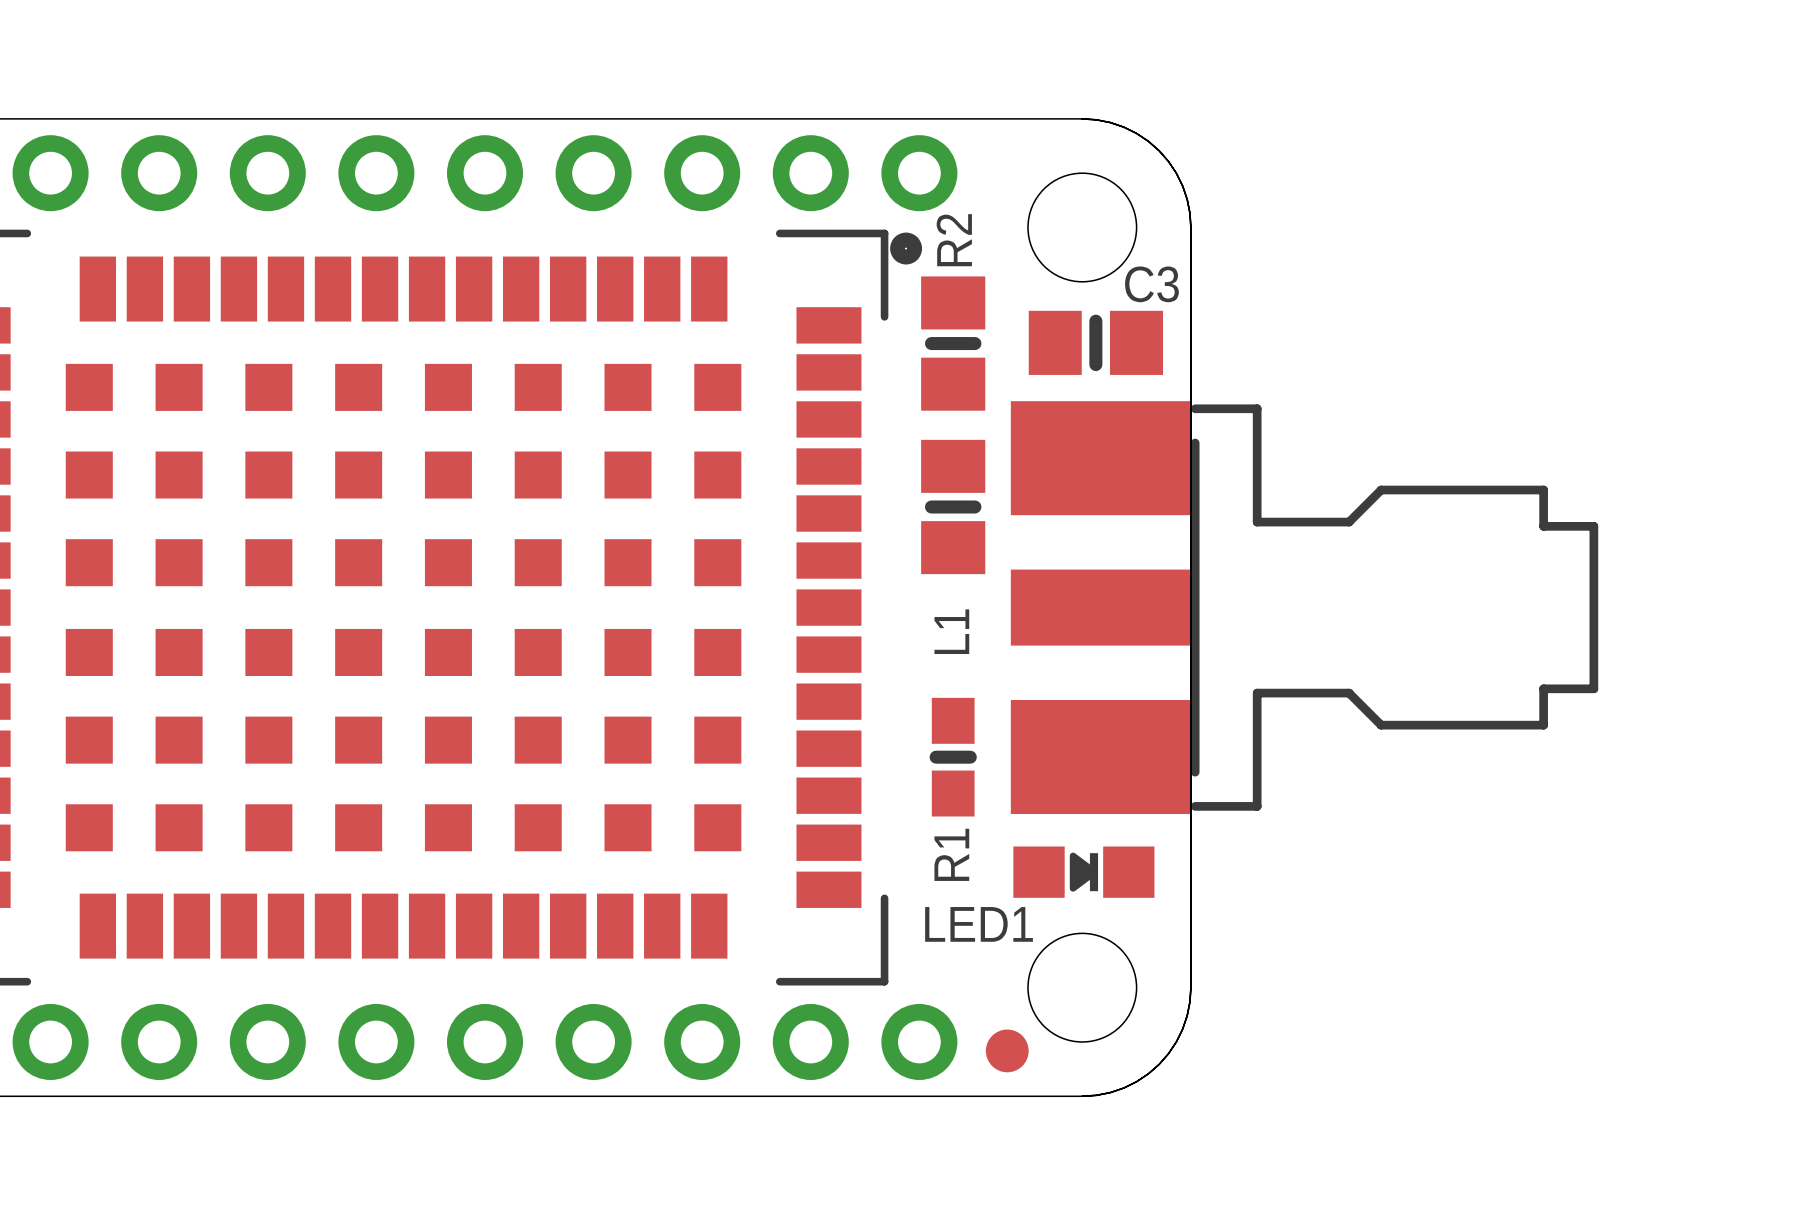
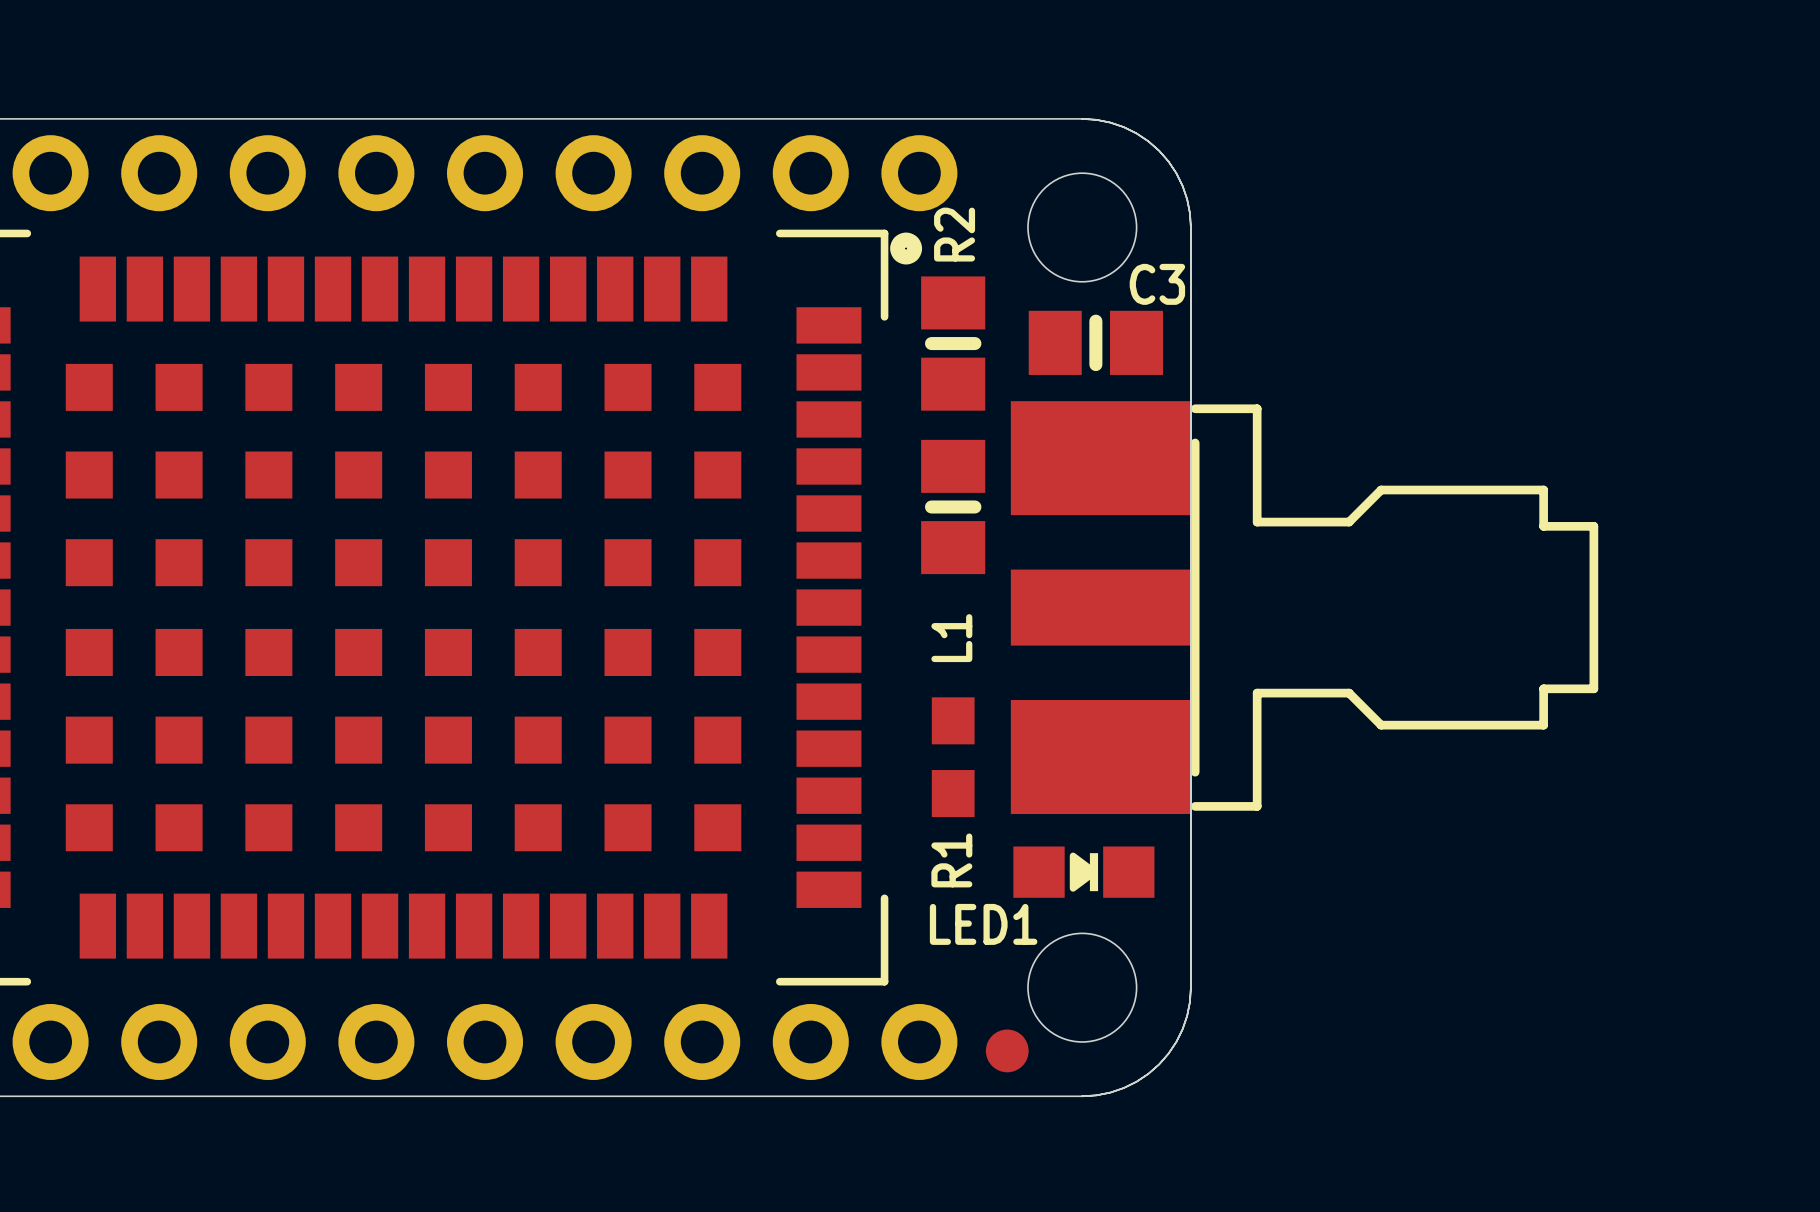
R1 footprint: [929, 697, 977, 817] -> [931, 697, 975, 818]

